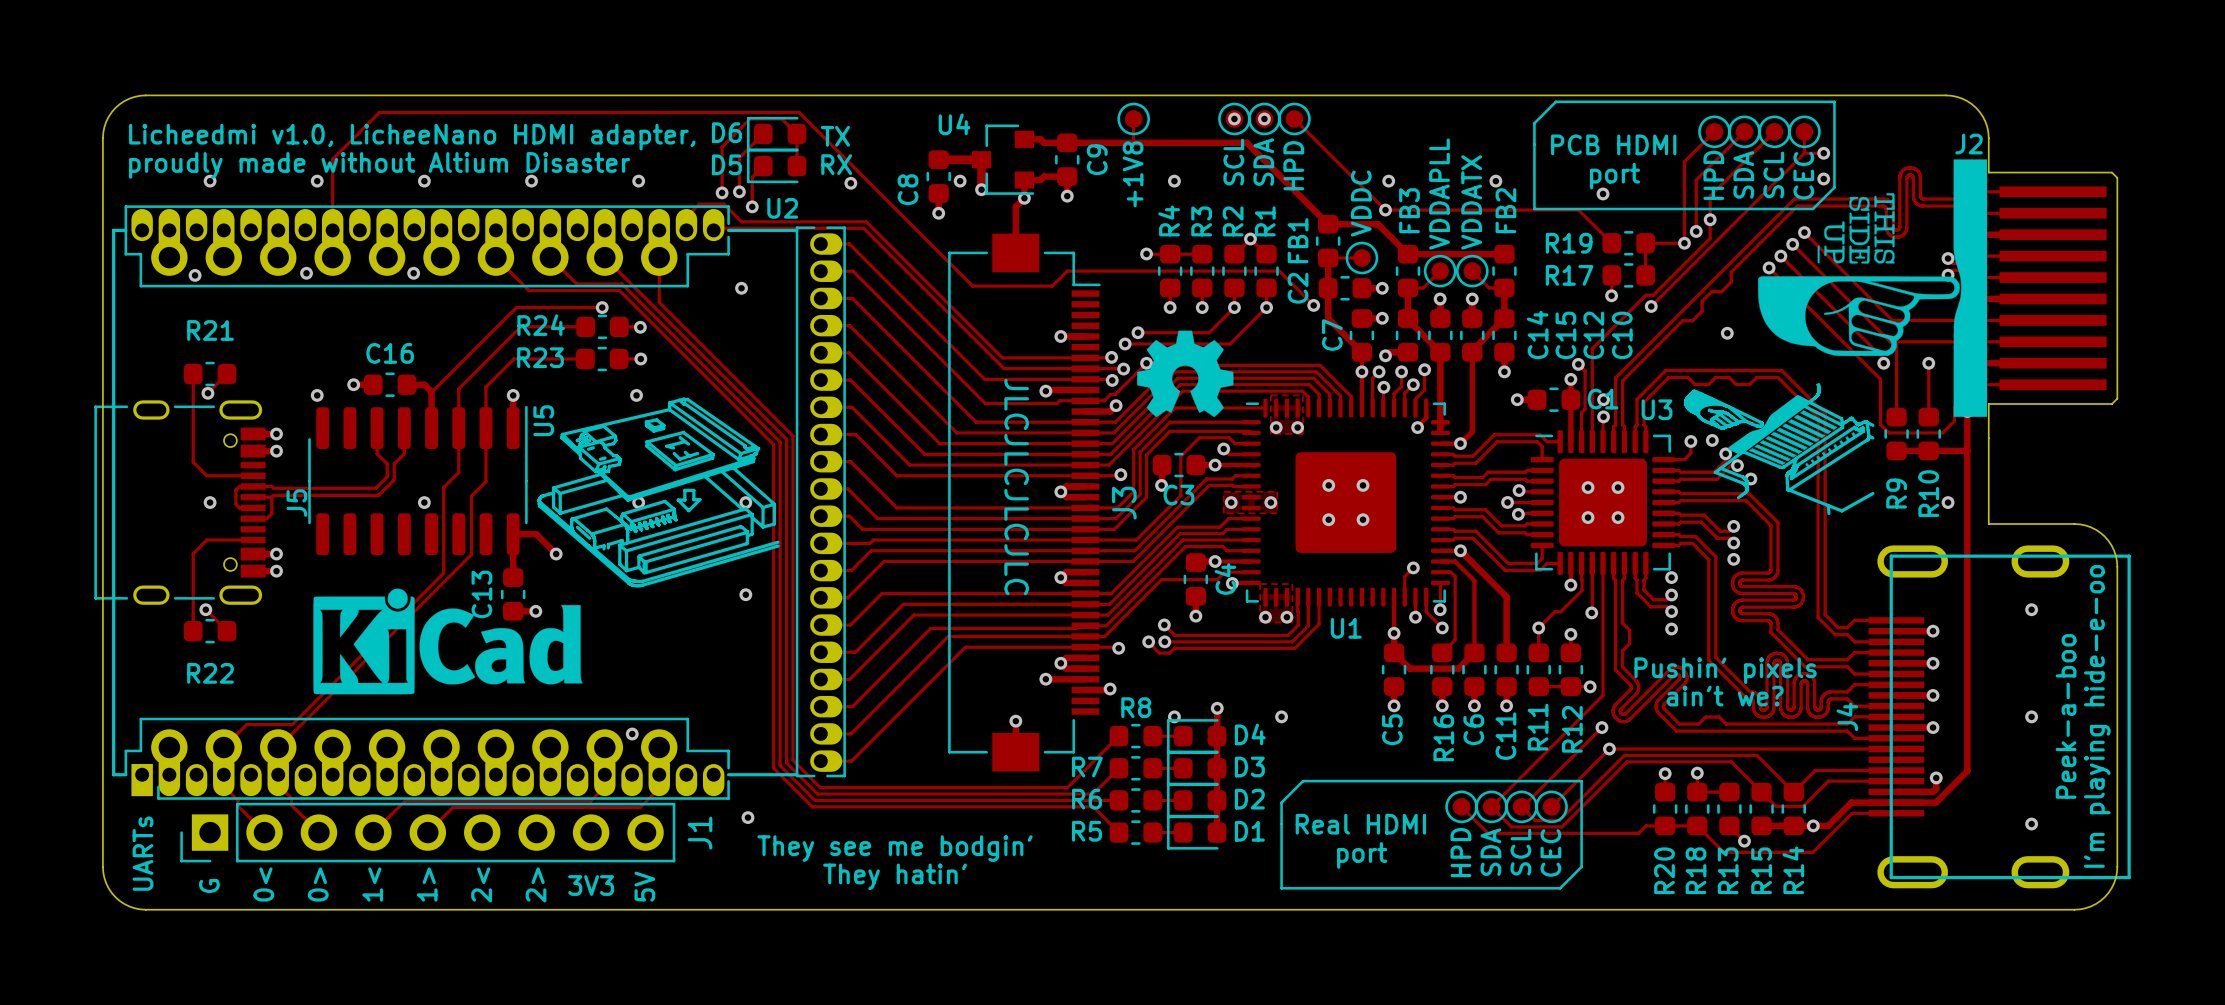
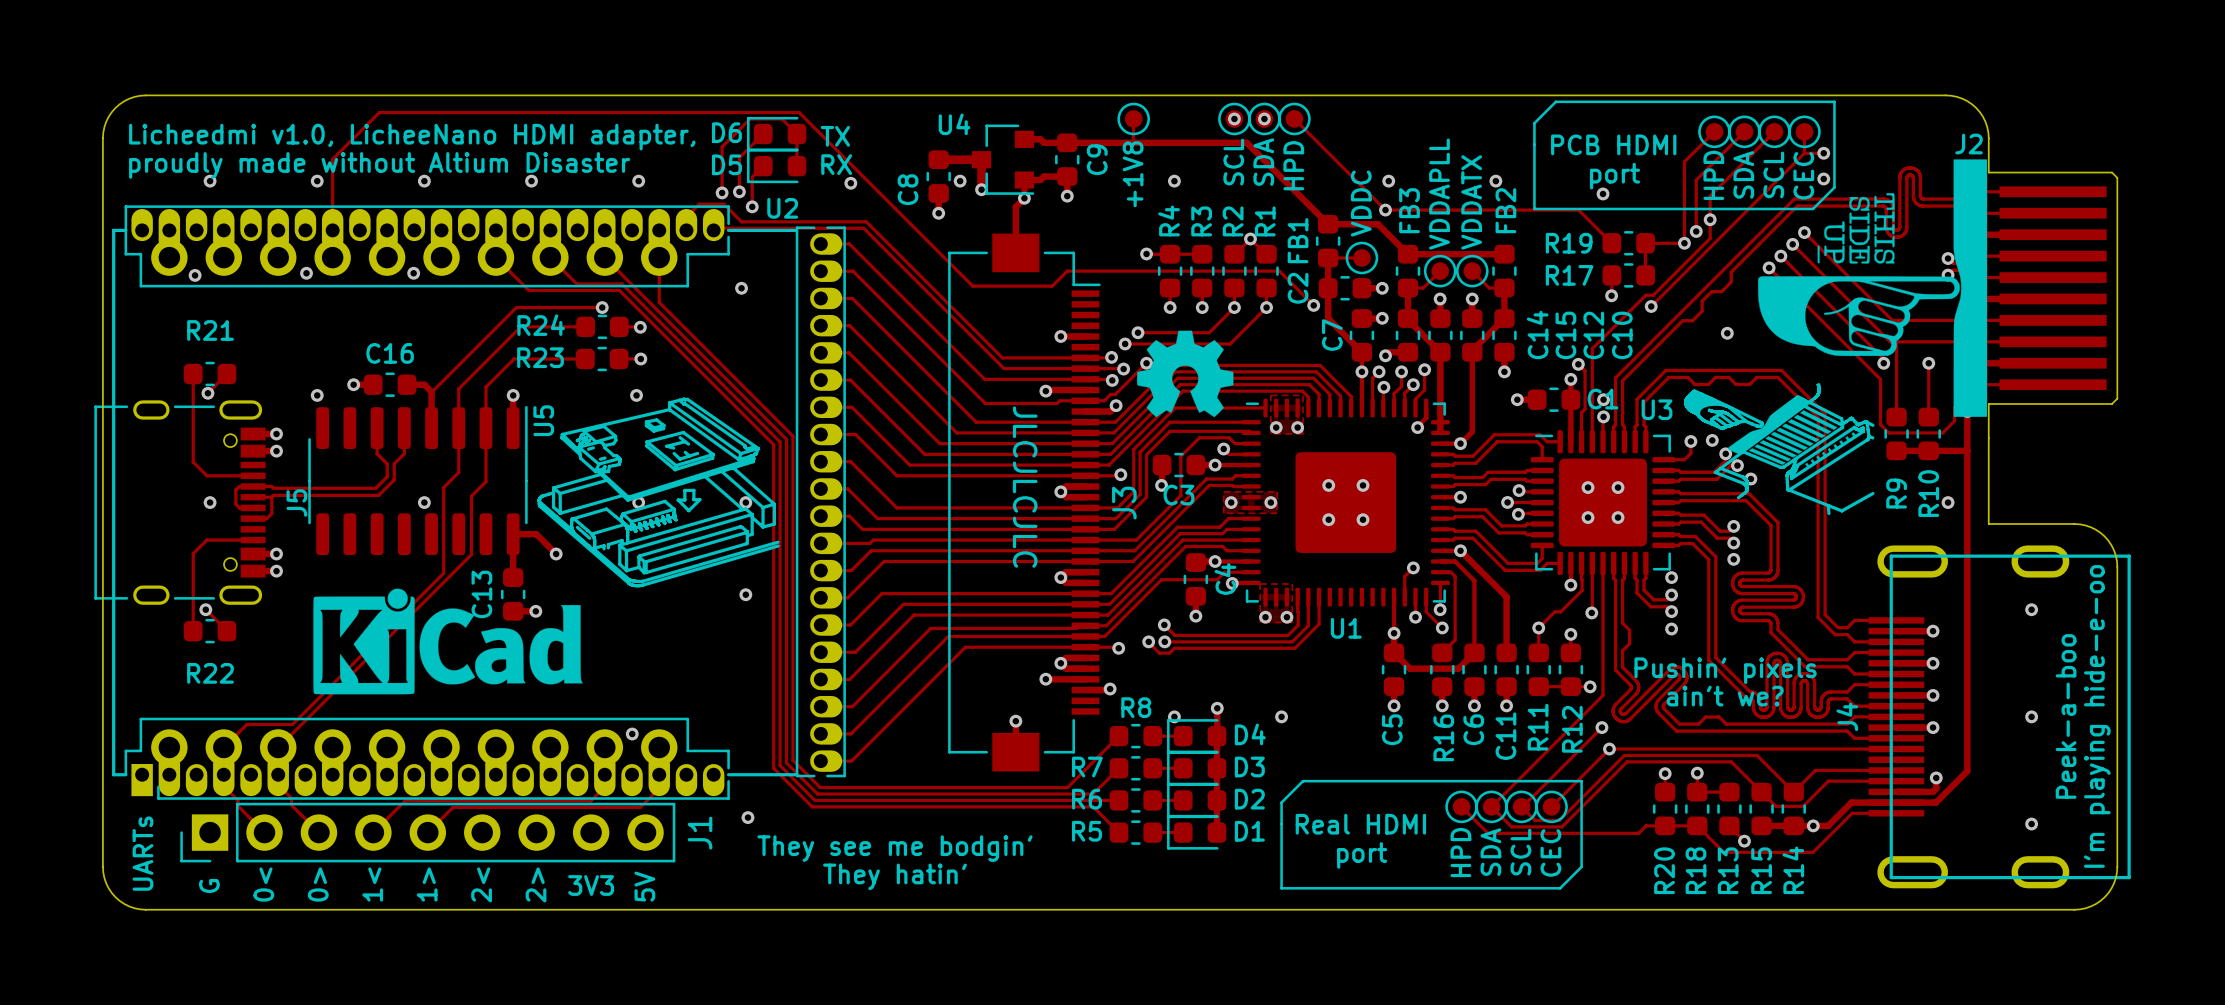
text: JLCJLCJLCJLC (1016, 487) -> JLCJLCJLC (1025, 487)

